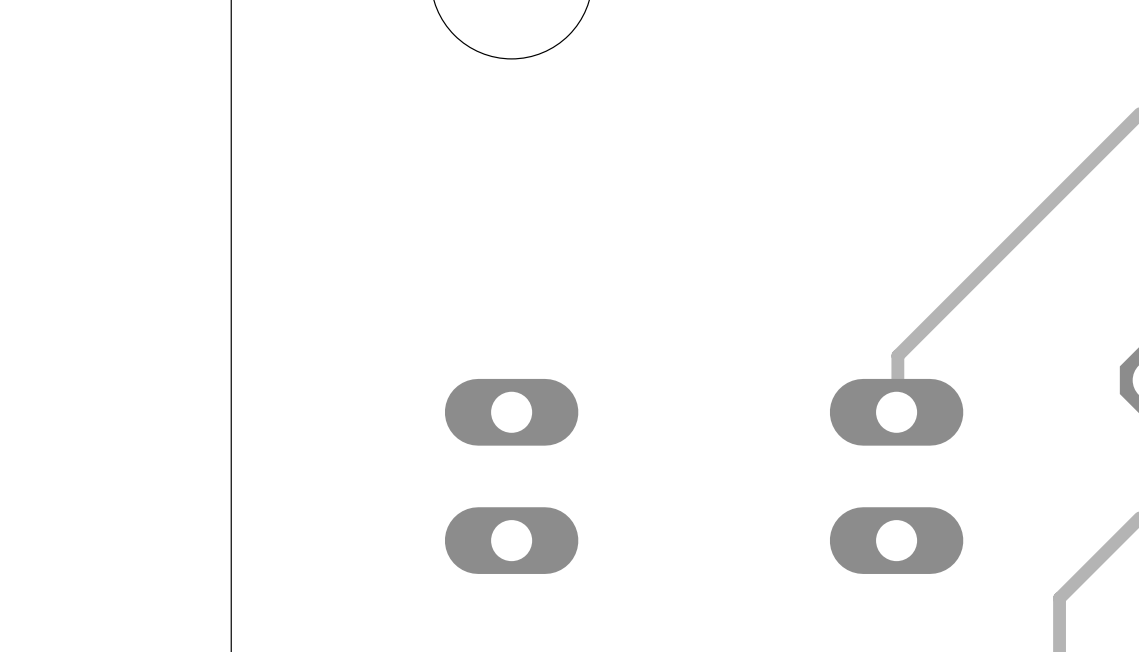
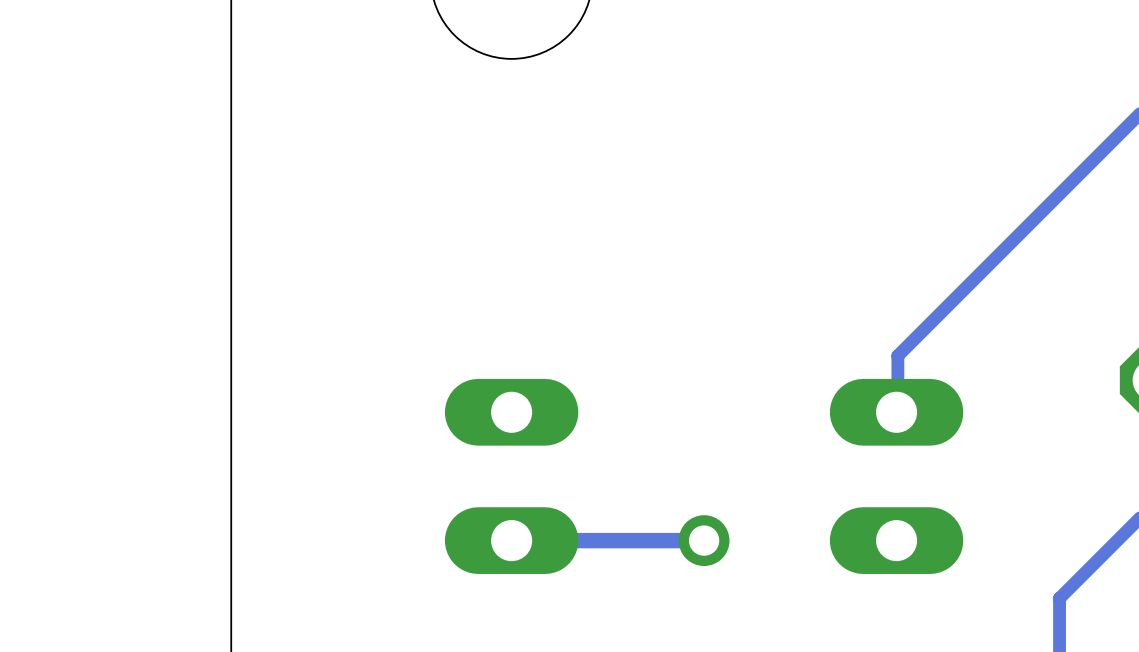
track: none -> (704, 540) (511, 540)
via: none -> (704, 540)

